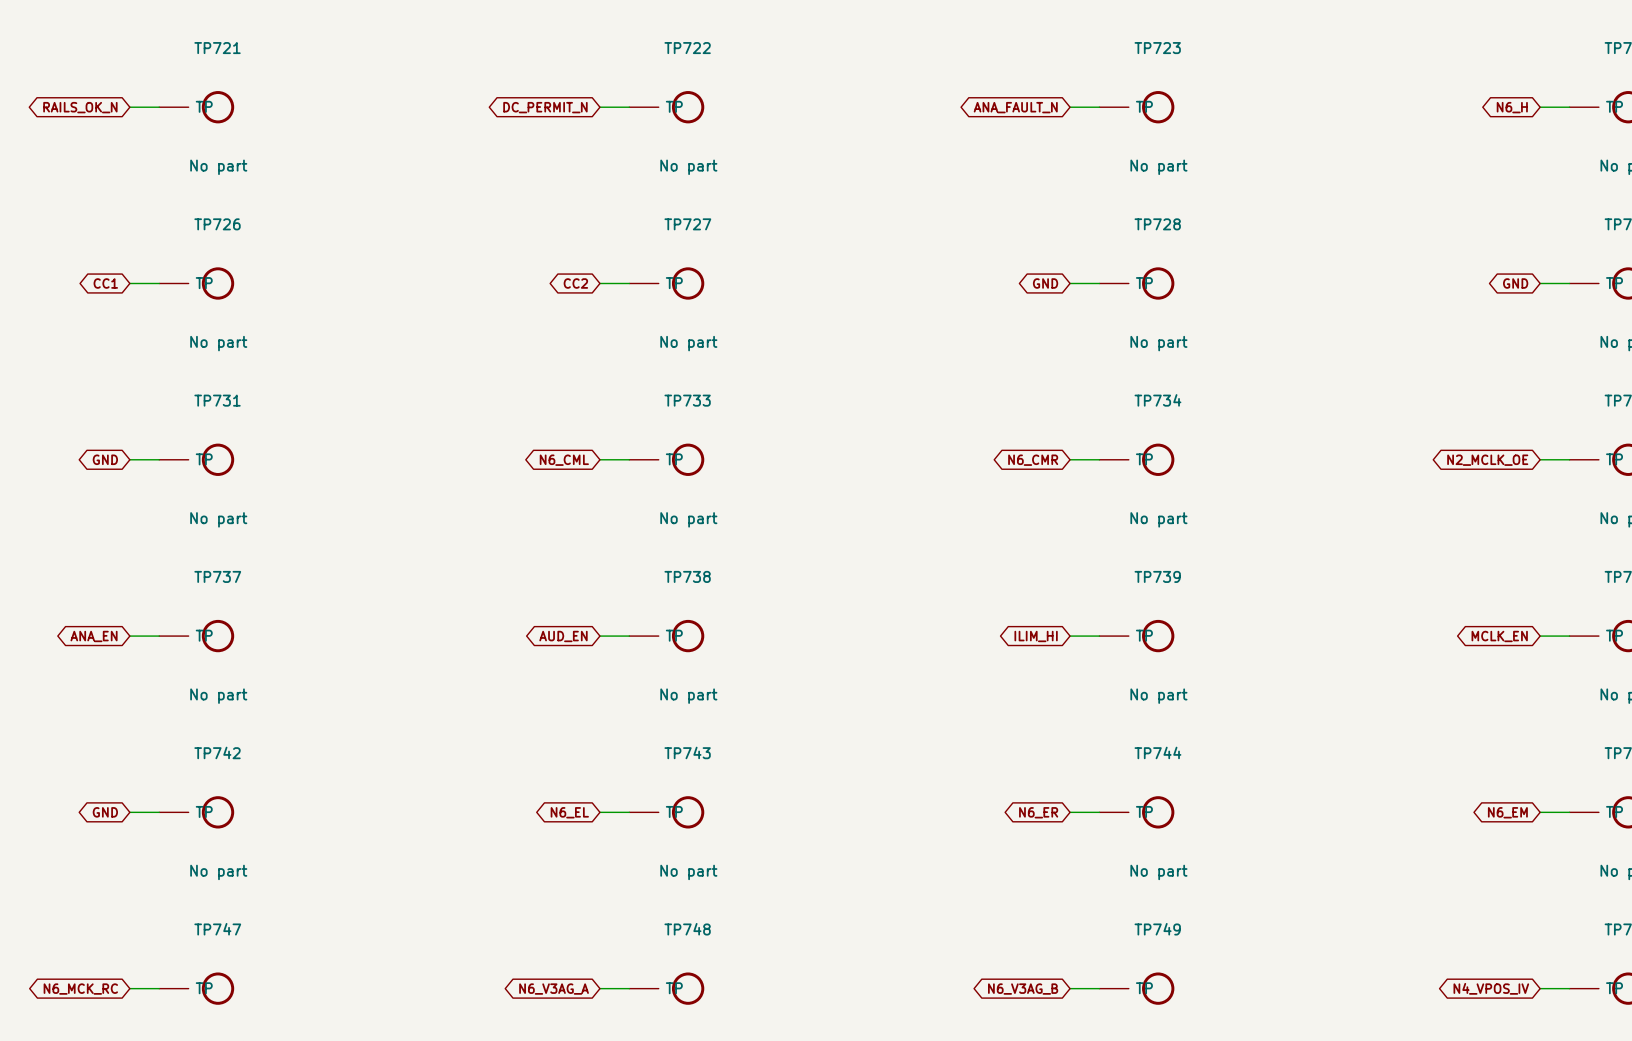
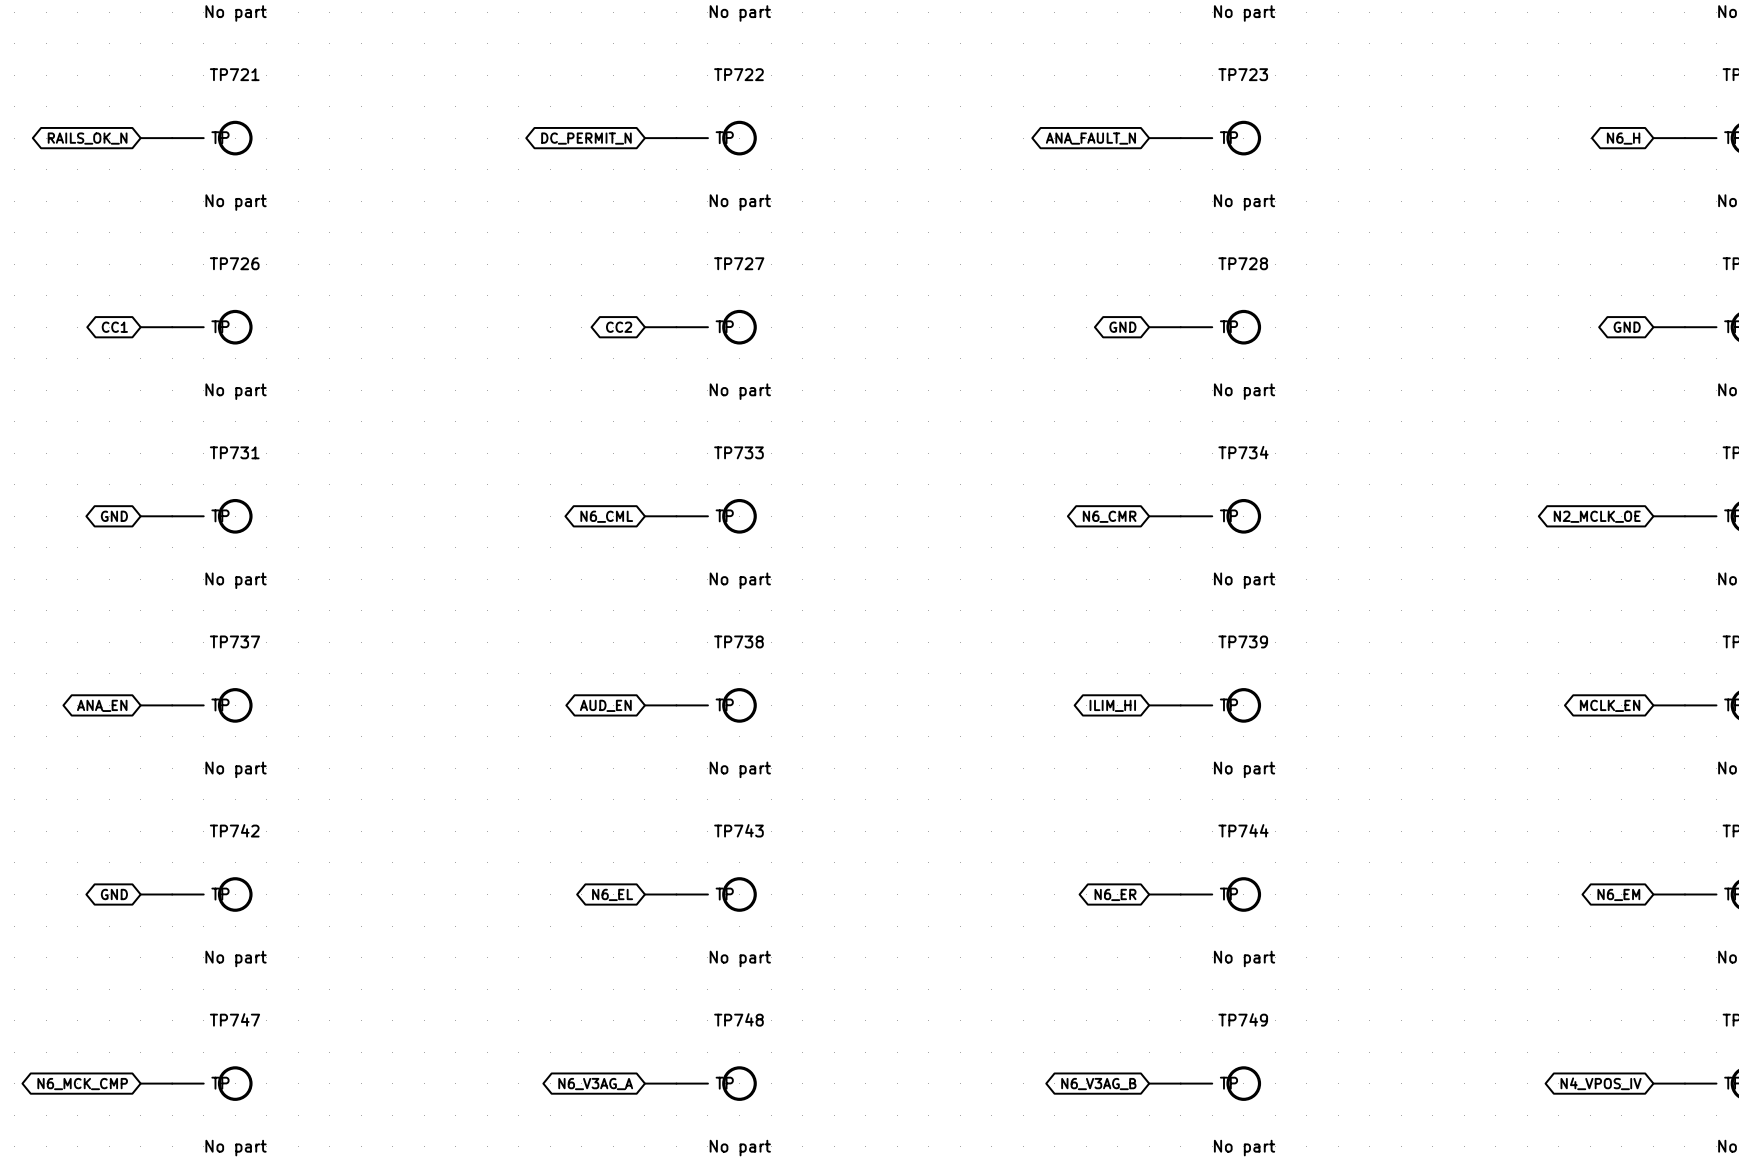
global label: N6_MCK_RC (80, 989) -> N6_MCK_CMP (82, 1084)

